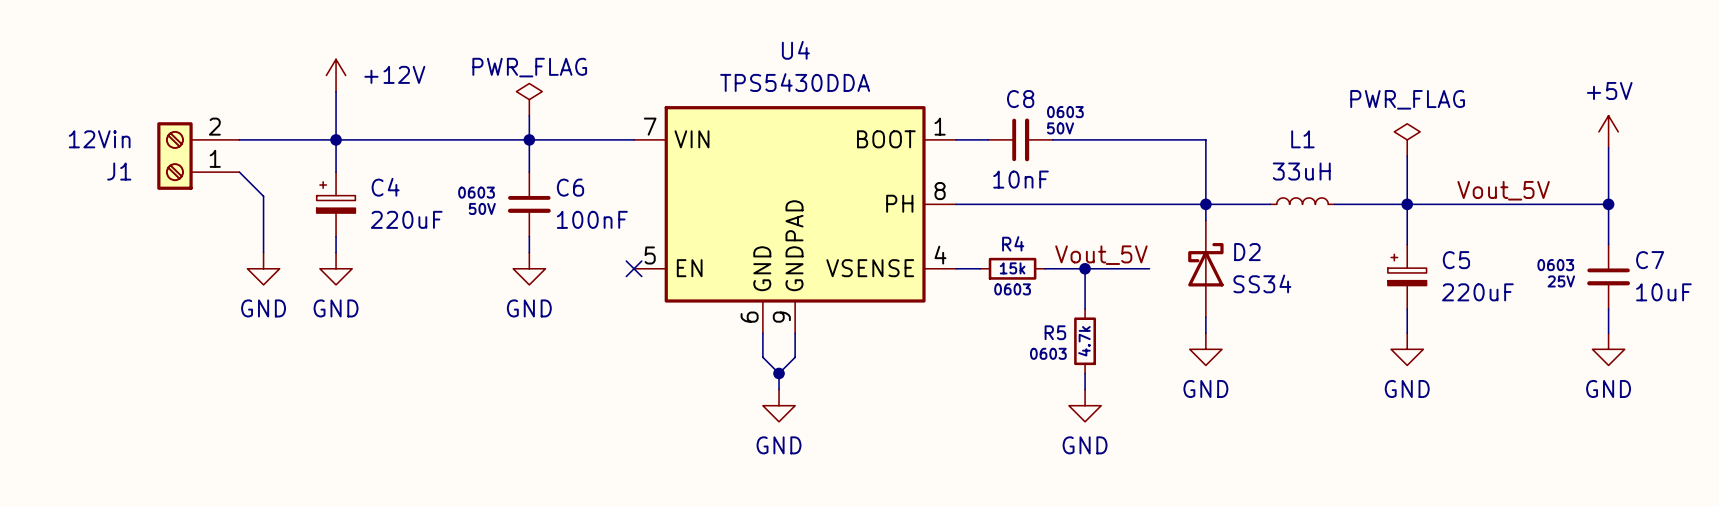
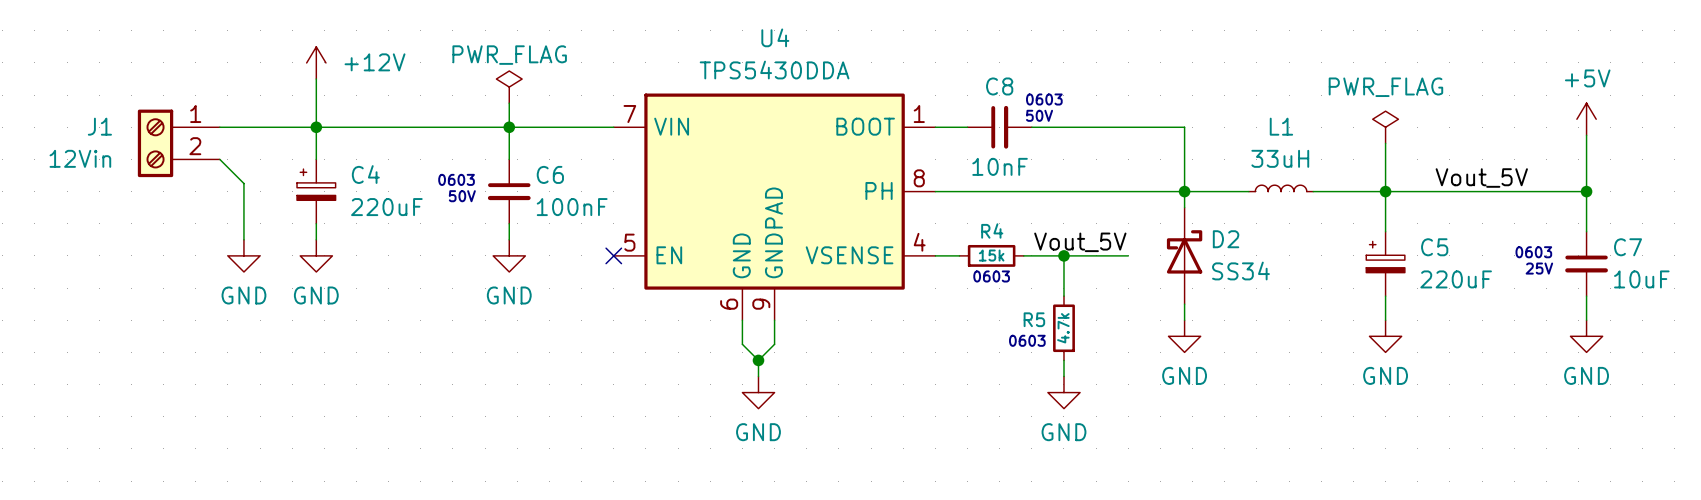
J1 flip: as is (174, 156) -> up-down (155, 143)

